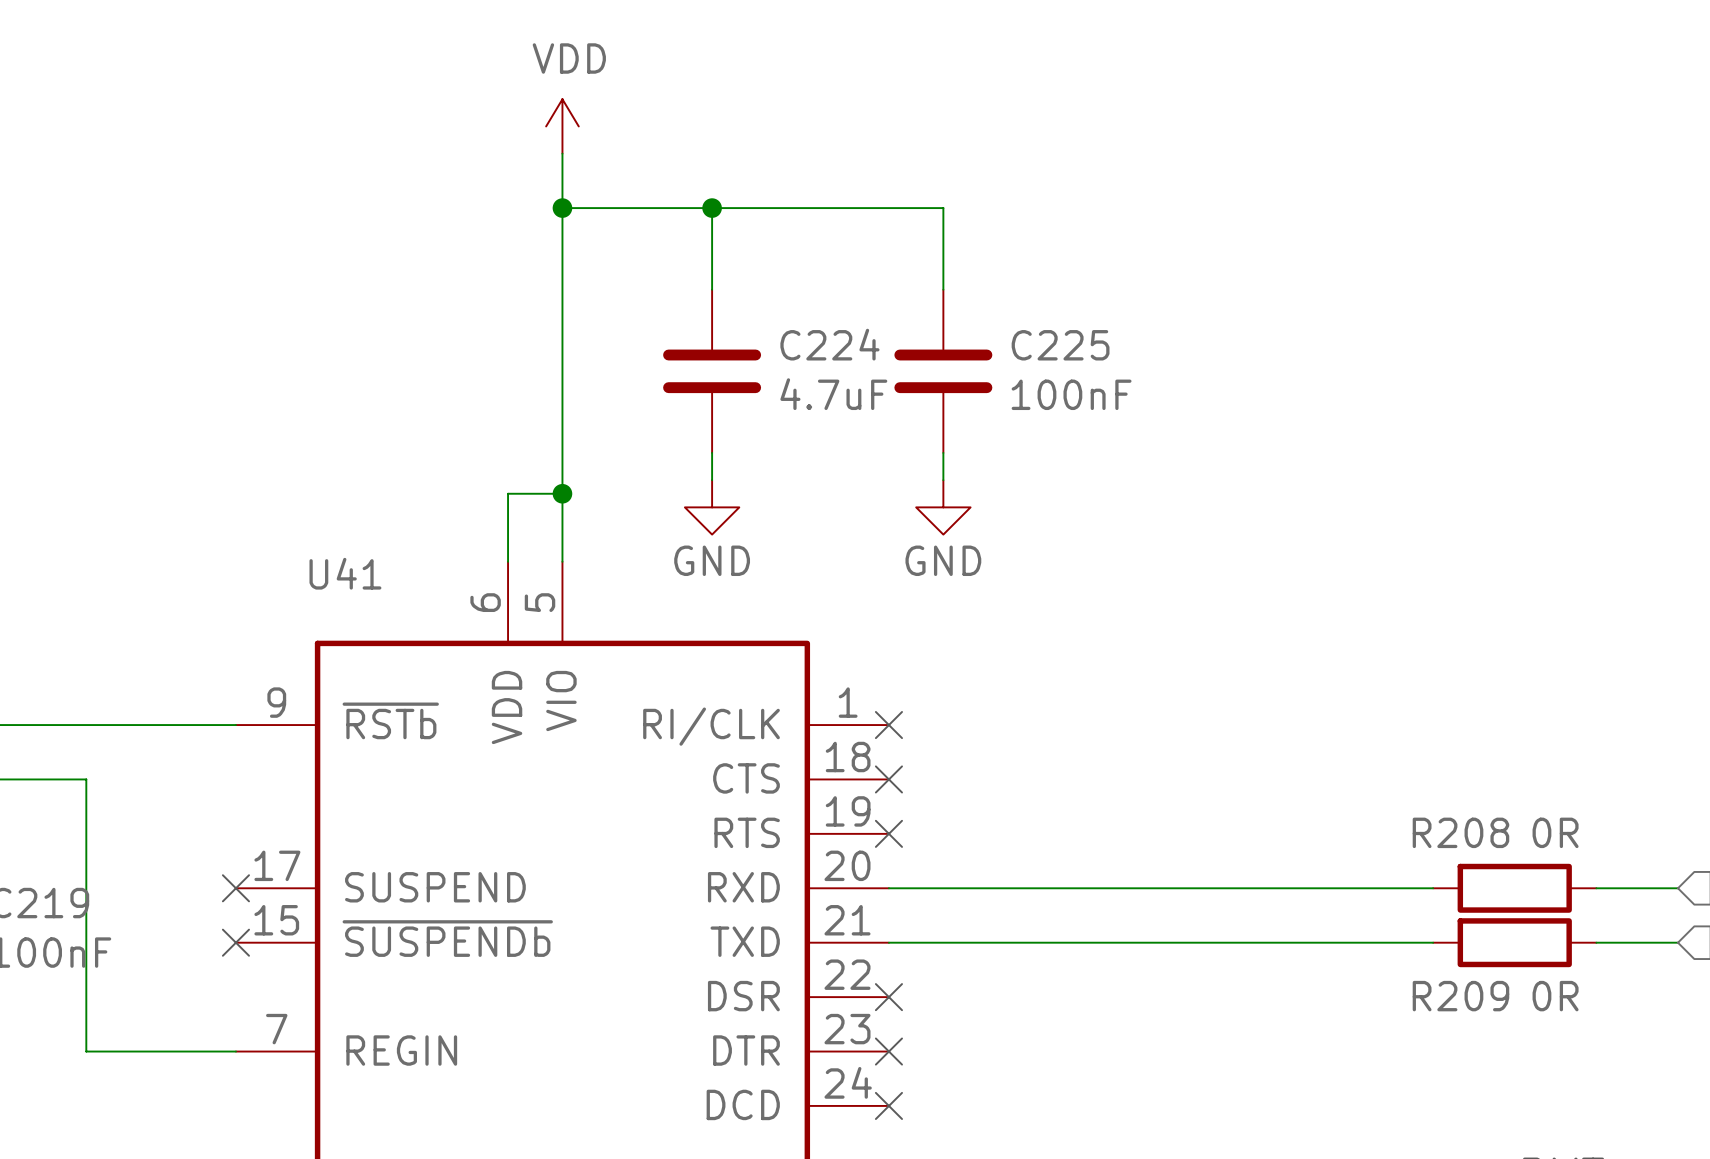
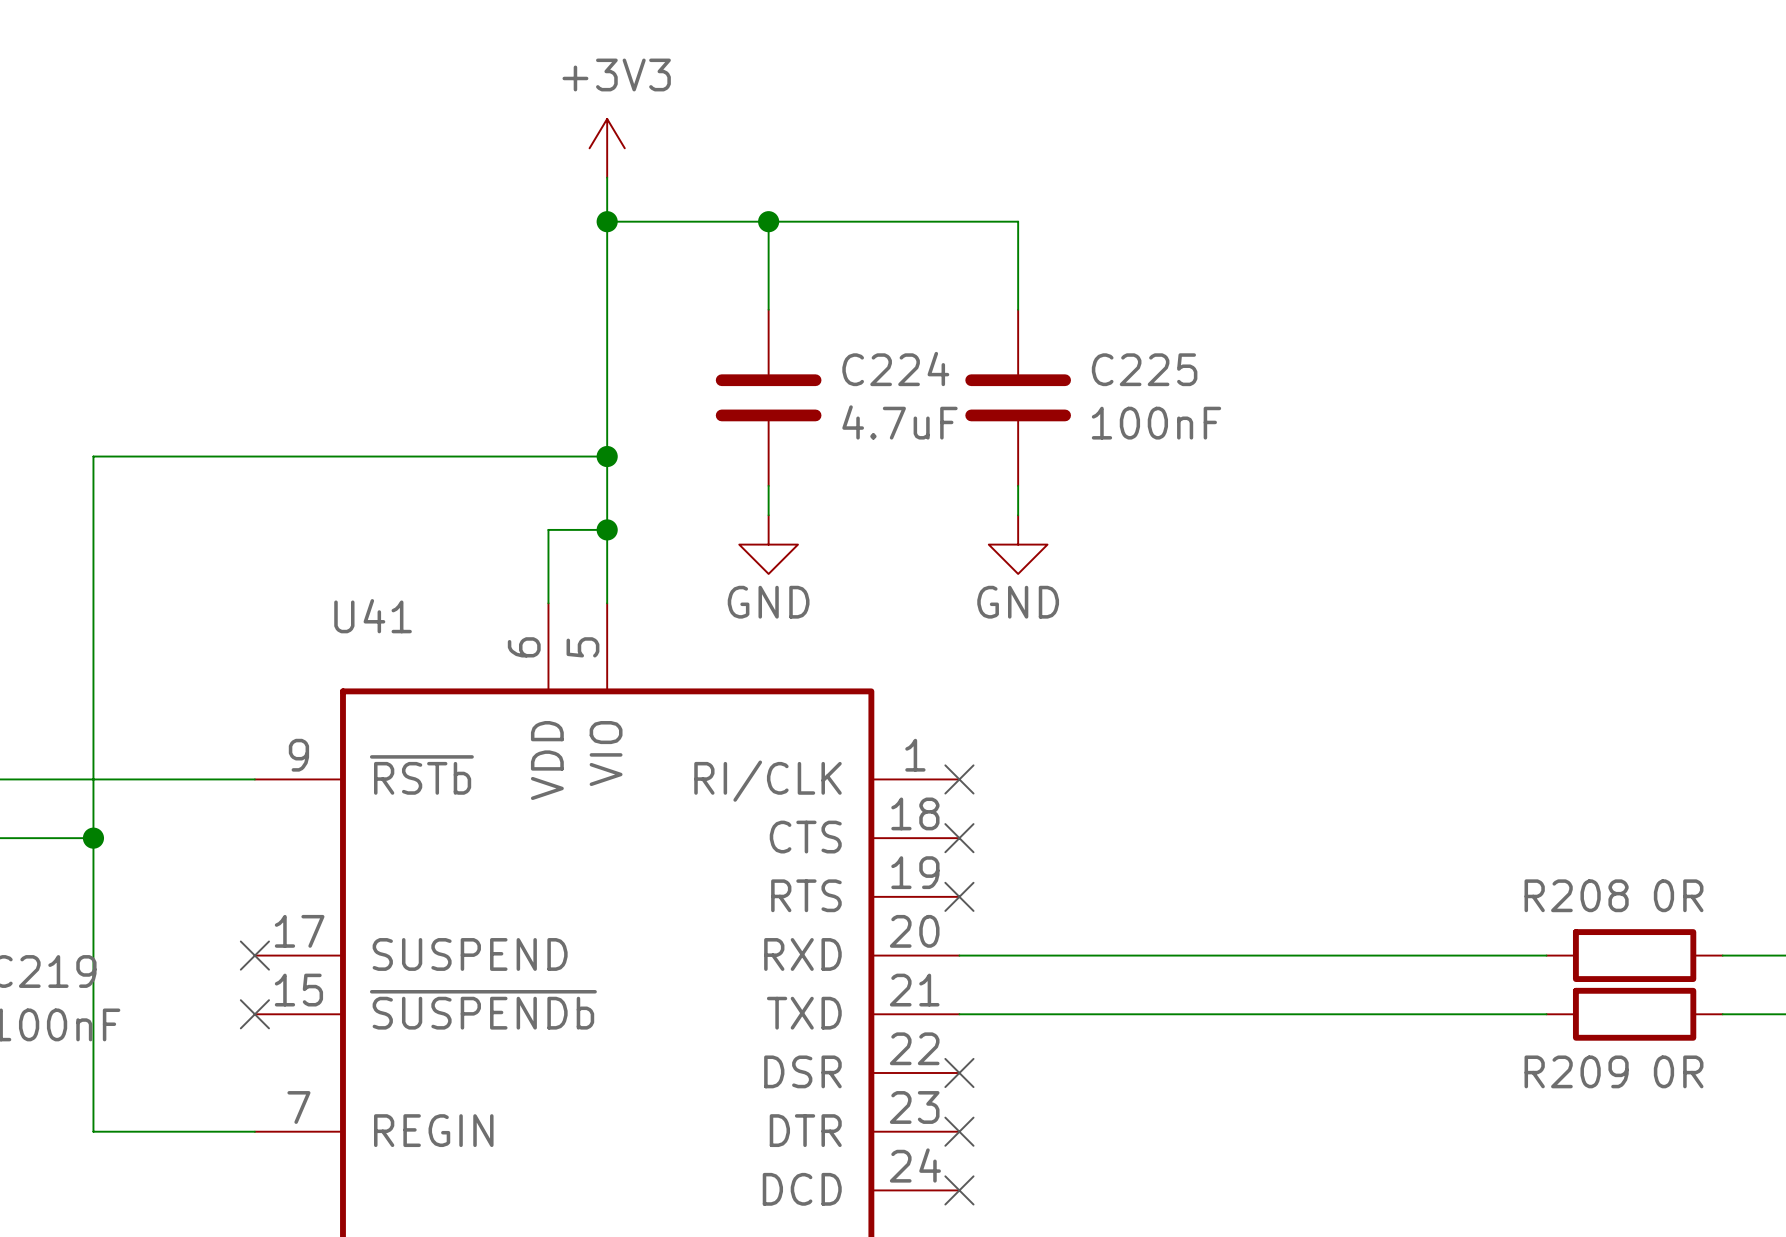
power symbol: VDD (562, 126) -> +3V3 (607, 148)
wire: none -> (607, 456) (93, 456) (93, 838)
junction: none -> (607, 456)
junction: none -> (93, 838)

